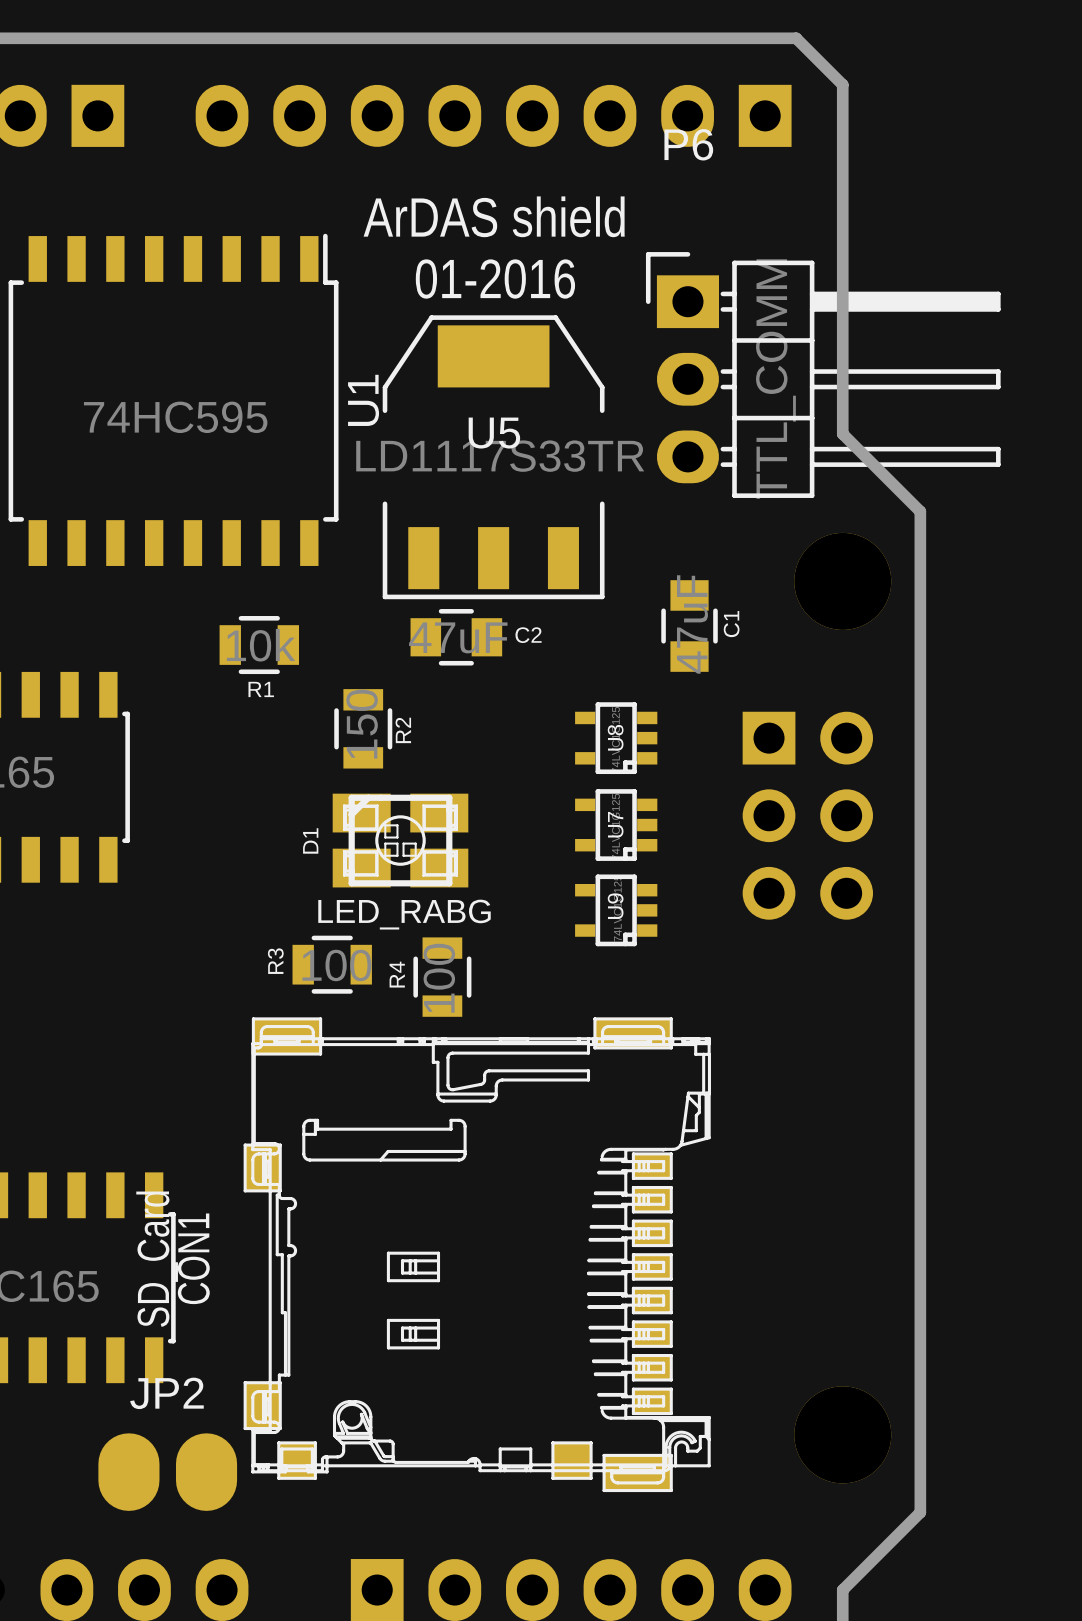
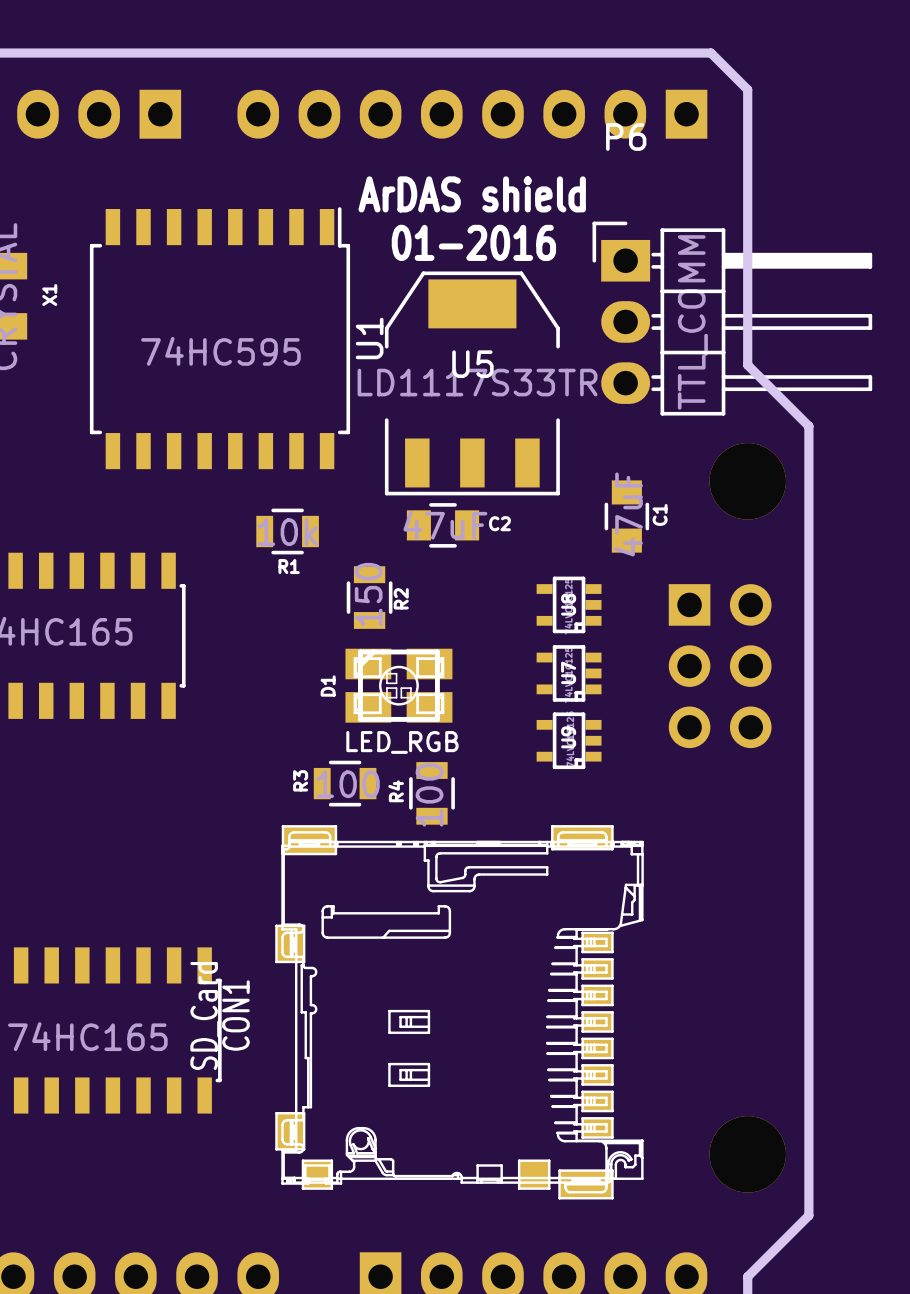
D1 value: LED_RABG (404, 914) -> LED_RGB (402, 742)
JP2: (167, 1472) -> none

